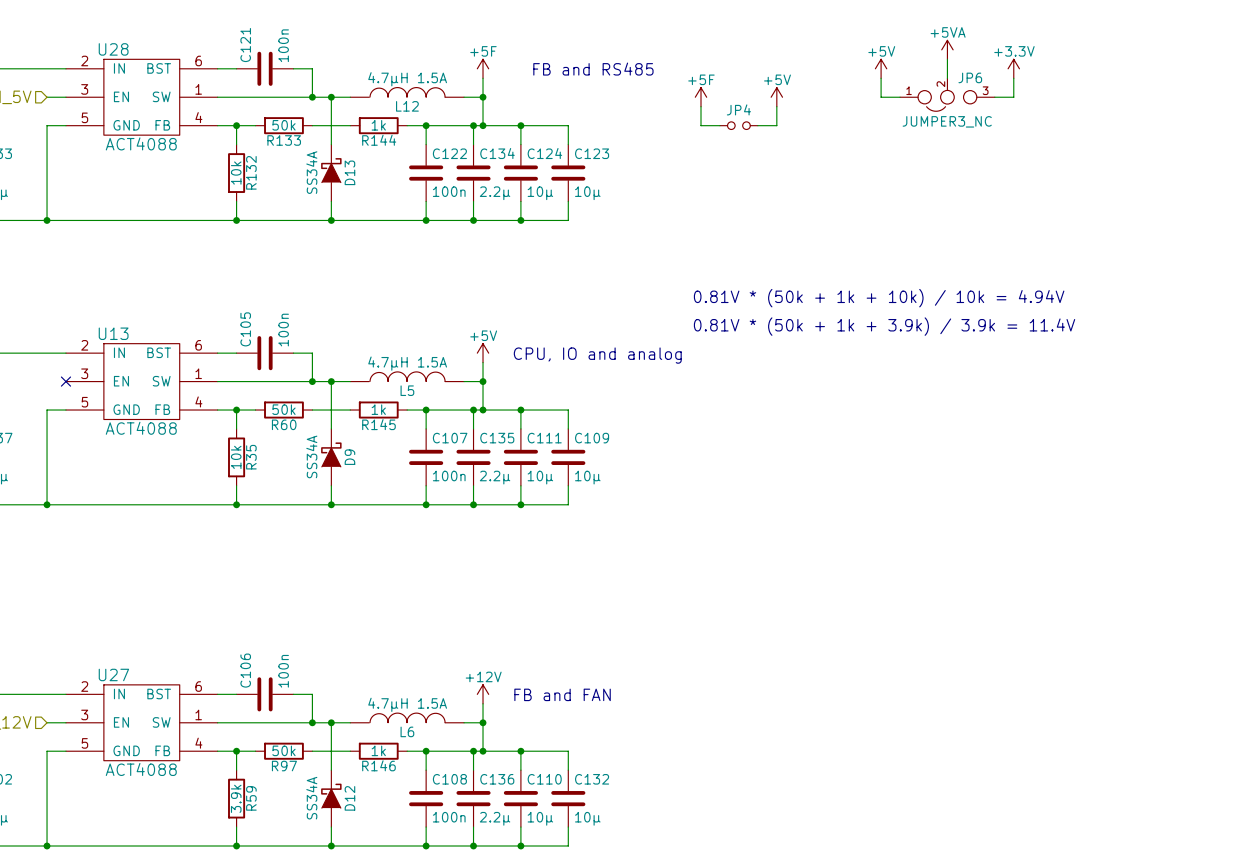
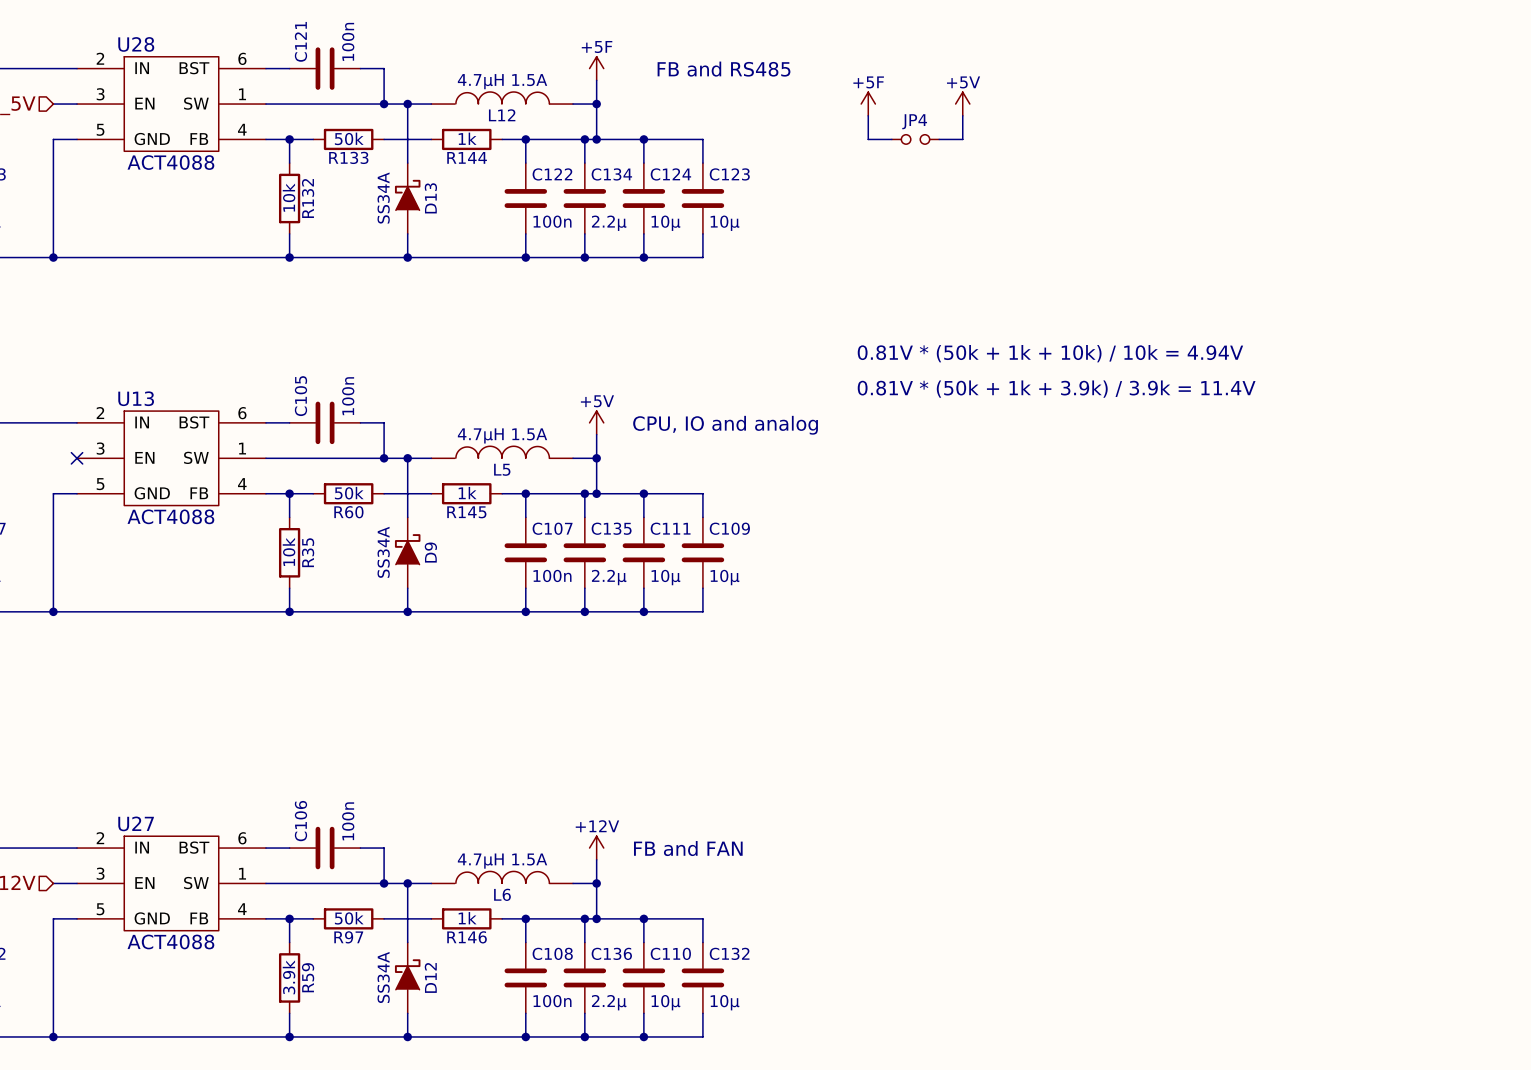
power symbol: +5VA (947, 49) -> none
wire: (947, 59) (947, 78) -> none
power symbol: +5V (881, 68) -> none
power symbol: +3.3V (1013, 68) -> none
wire: (881, 78) (881, 97) (900, 97) -> none
wire: (1013, 78) (1013, 97) (994, 97) -> none
JP6: JUMPER3_NC (947, 94) -> none

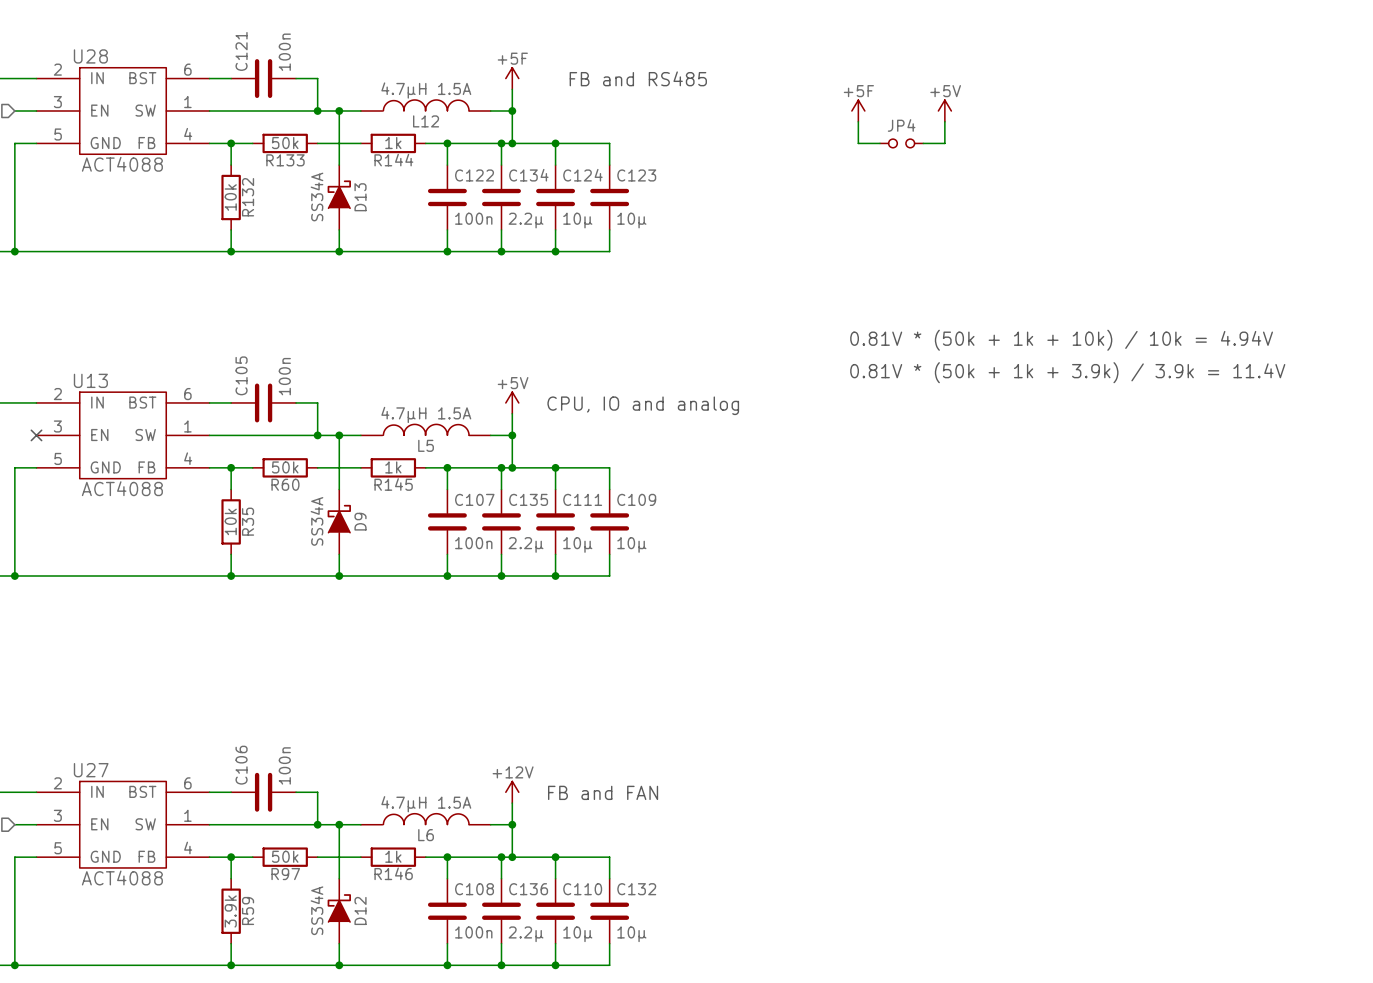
power symbol position: +5F (868, 104) -> +5F (858, 110)
power symbol position: +5V (962, 104) -> +5V (944, 110)
wire: (868, 115) (868, 139) (891, 139) -> (858, 121) (858, 143) (879, 143)
wire: (962, 115) (962, 139) (939, 139) -> (944, 121) (944, 143) (923, 143)
JP4 position: (915, 139) -> (901, 143)
text position: 0.81V * (50k + 1k + 10k) / 10k = 4.94V (1050, 353) -> 0.81V * (50k + 1k + 10k) / 10k = 4.94V (1061, 340)
text position: 0.81V * (50k + 1k + 3.9k) / 3.9k = 11.4V (1056, 389) -> 0.81V * (50k + 1k + 3.9k) / 3.9k = 11.4V (1067, 372)

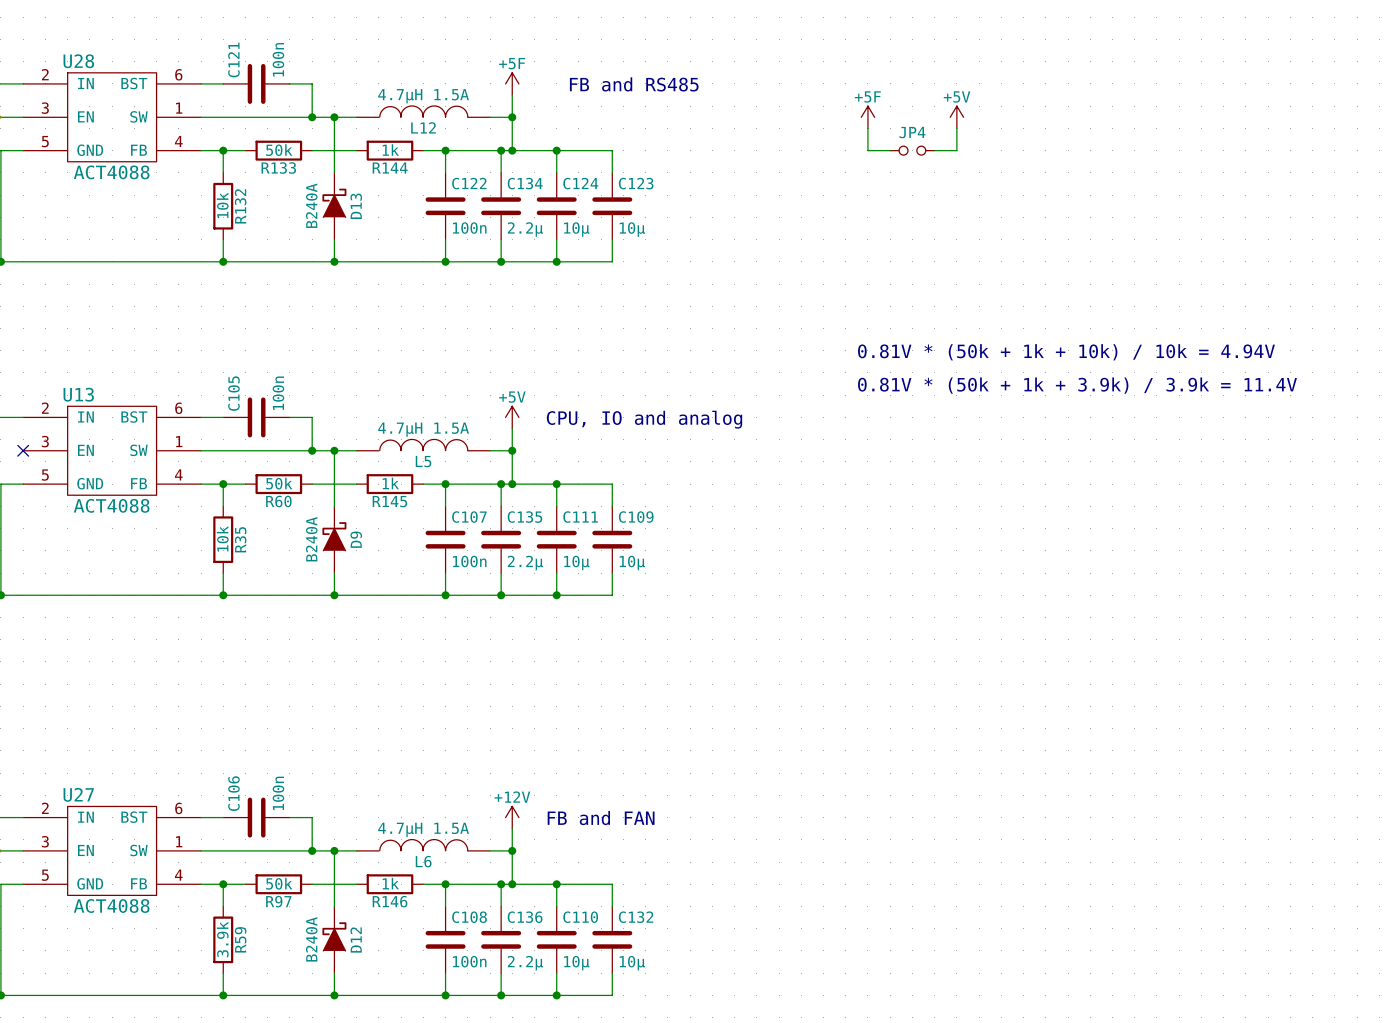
D13 value: SS34A (316, 196) -> B240A (311, 205)
D9 value: SS34A (316, 521) -> B240A (311, 539)
D12 value: SS34A (316, 910) -> B240A (311, 939)

